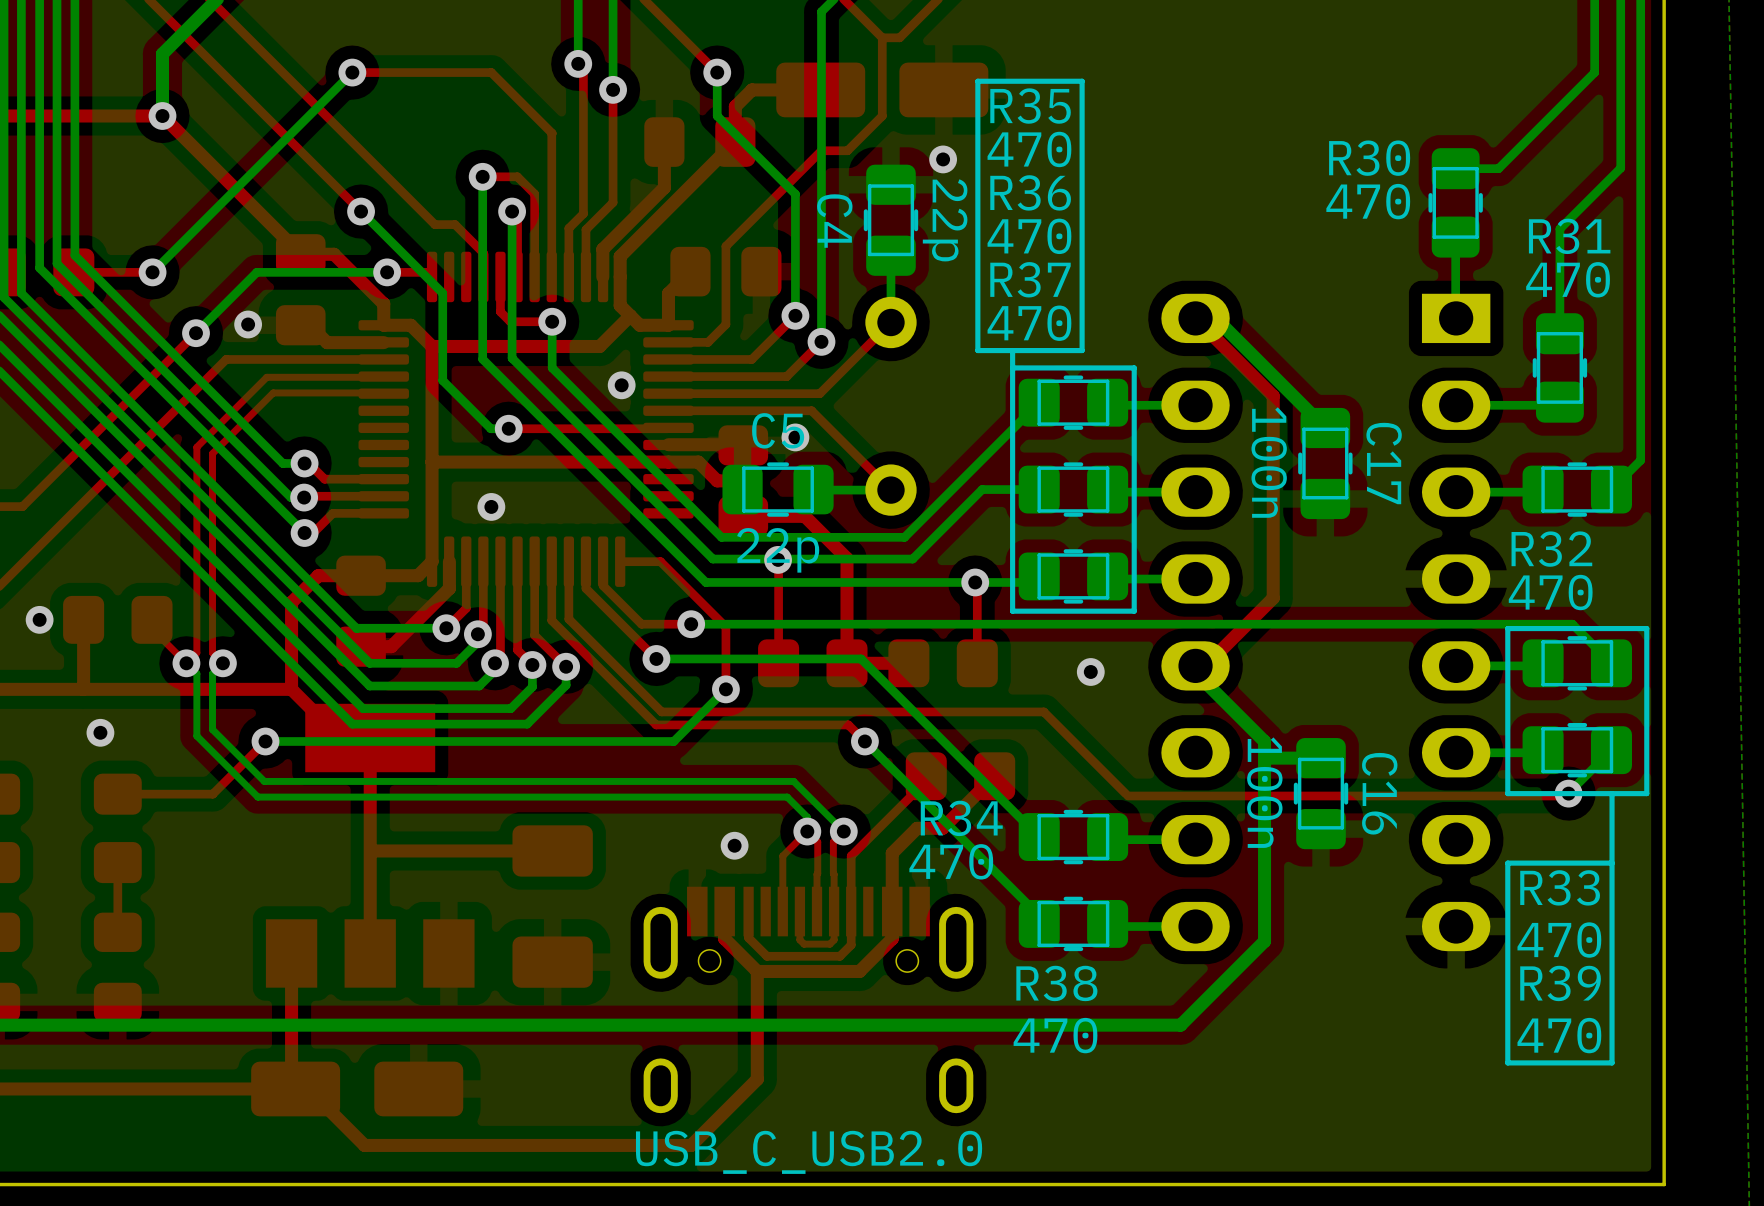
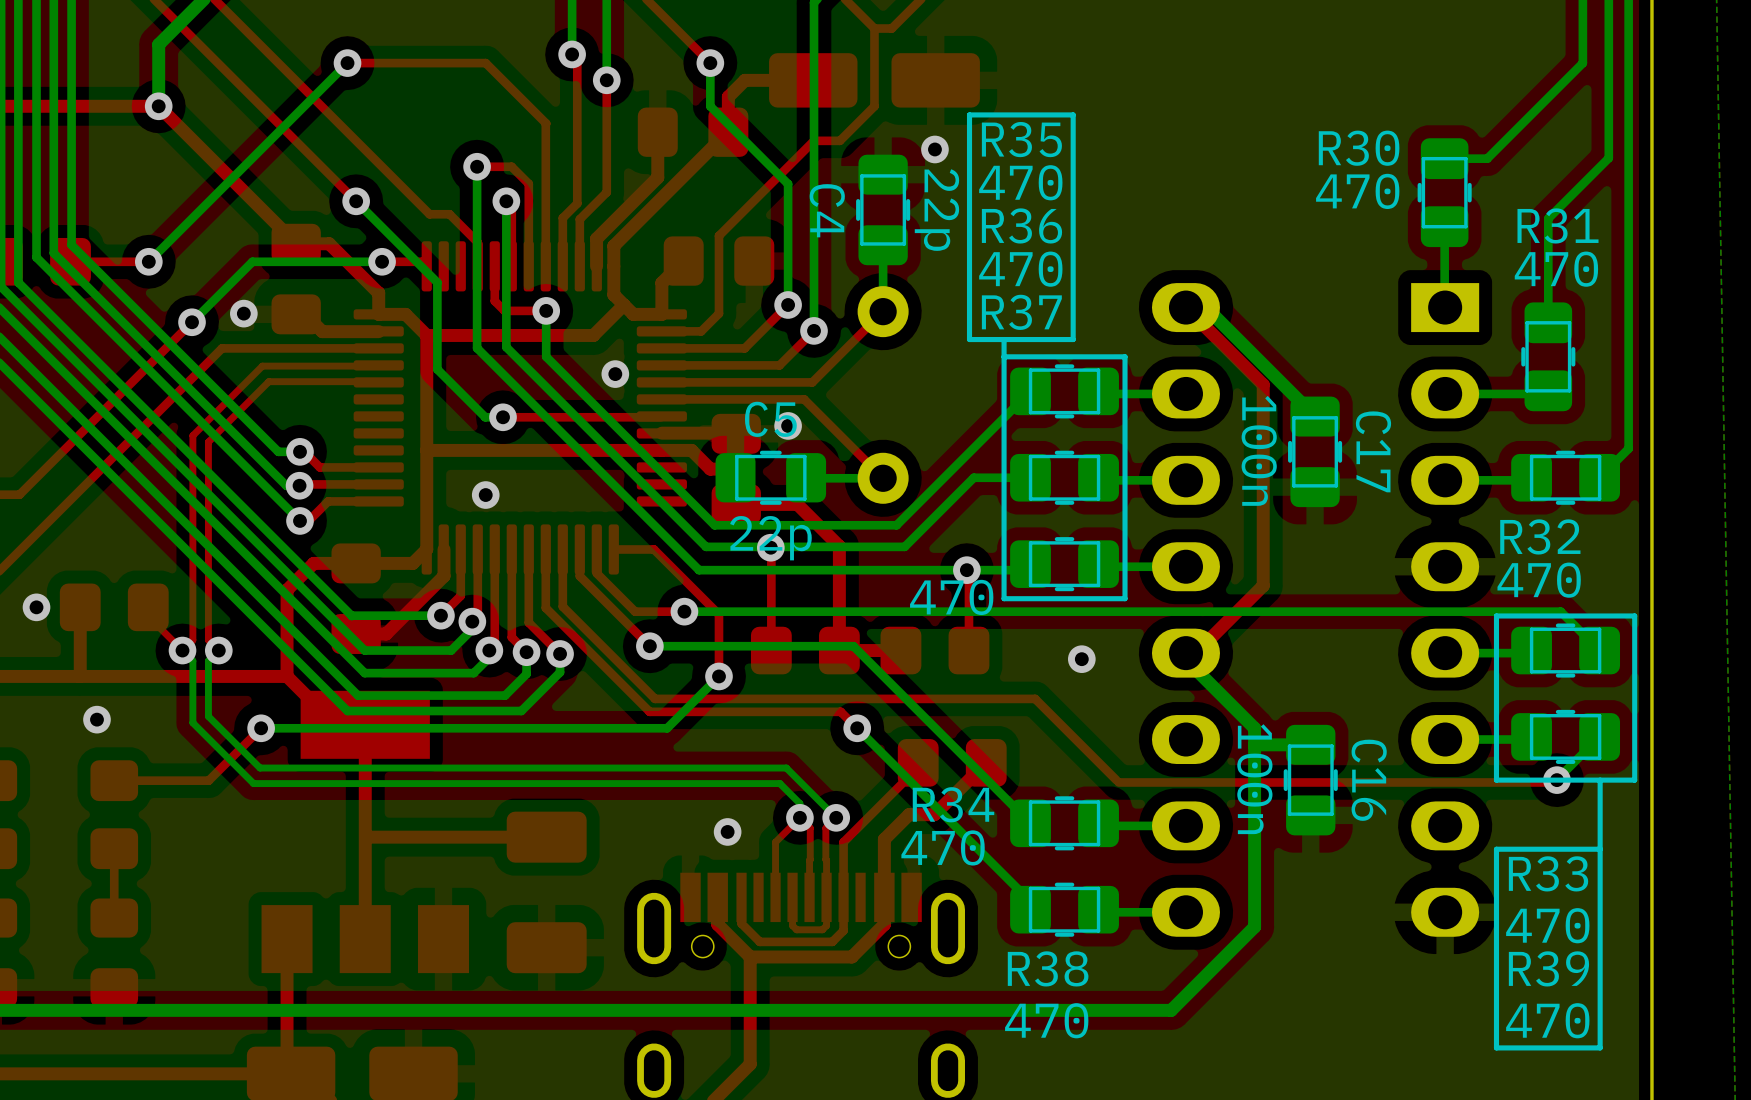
R35 name position: R35 (1030, 106) -> R35 (1021, 139)
line: (1082, 124) (1082, 81) (977, 81) (977, 124) -> (1073, 114) (969, 114)
R35 value position: 470 (1029, 149) -> 470 (1020, 182)
R36 name position: R36 (1030, 192) -> R36 (1021, 225)
R36 value position: 470 (1029, 236) -> 470 (1020, 269)
R37 name position: R37 (1030, 279) -> R37 (1021, 312)
R37 value position: 470 (1029, 323) -> 470 (951, 597)

